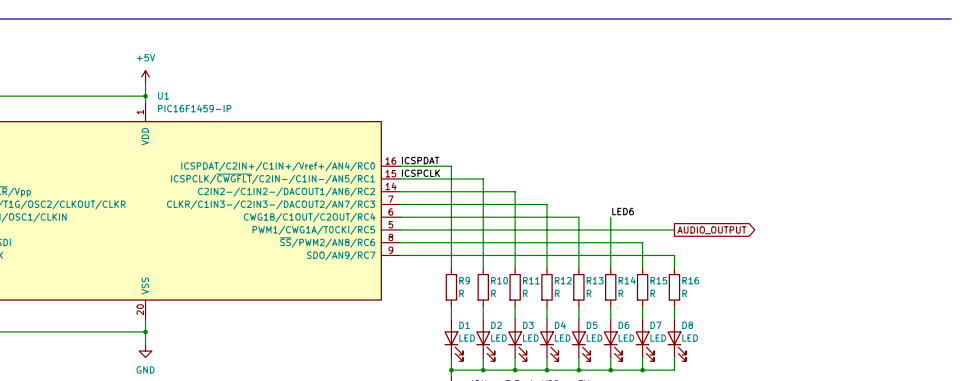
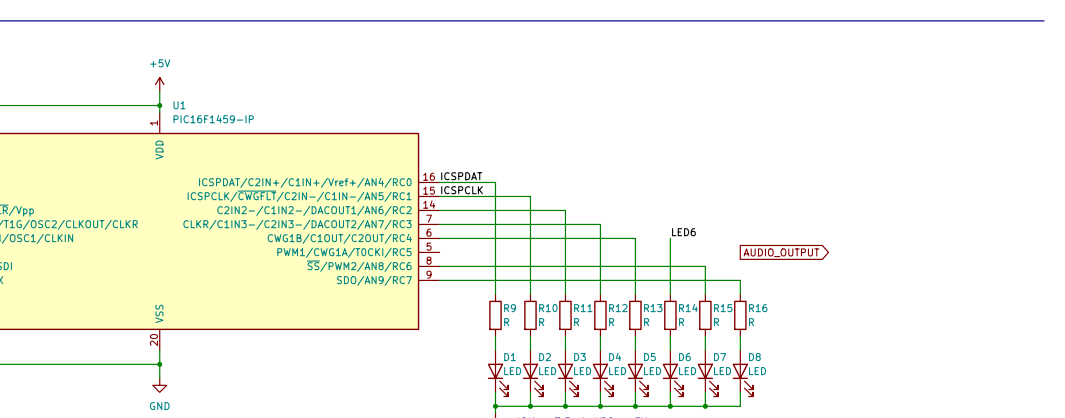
wire: (400, 229) (674, 229) -> none

